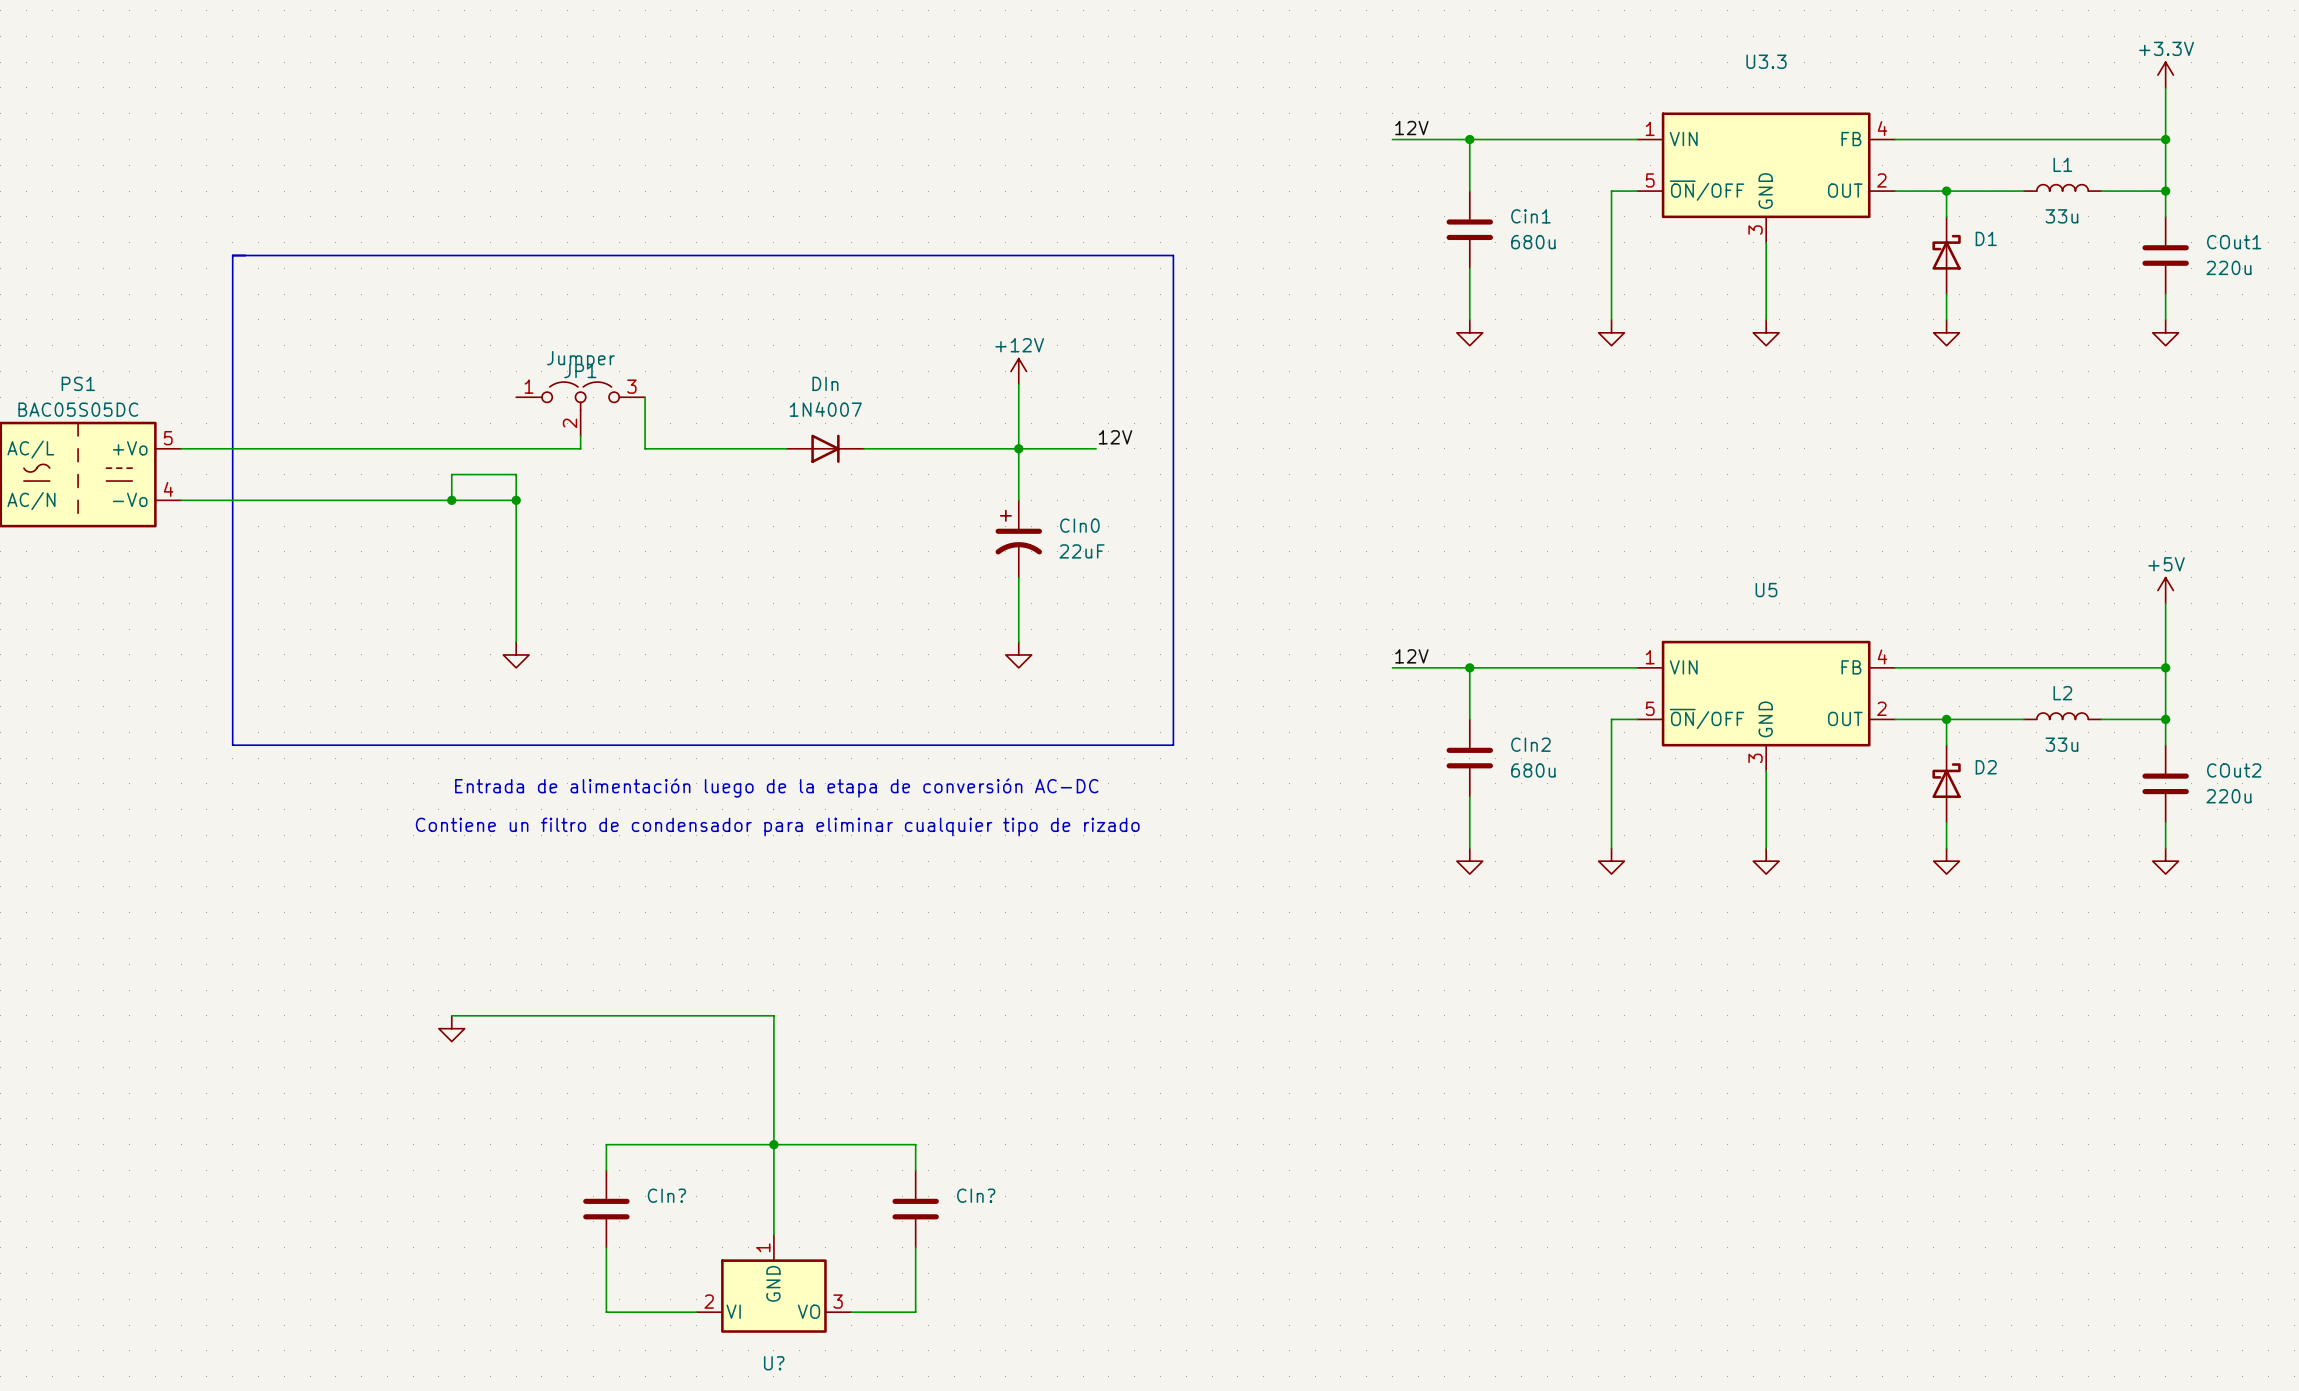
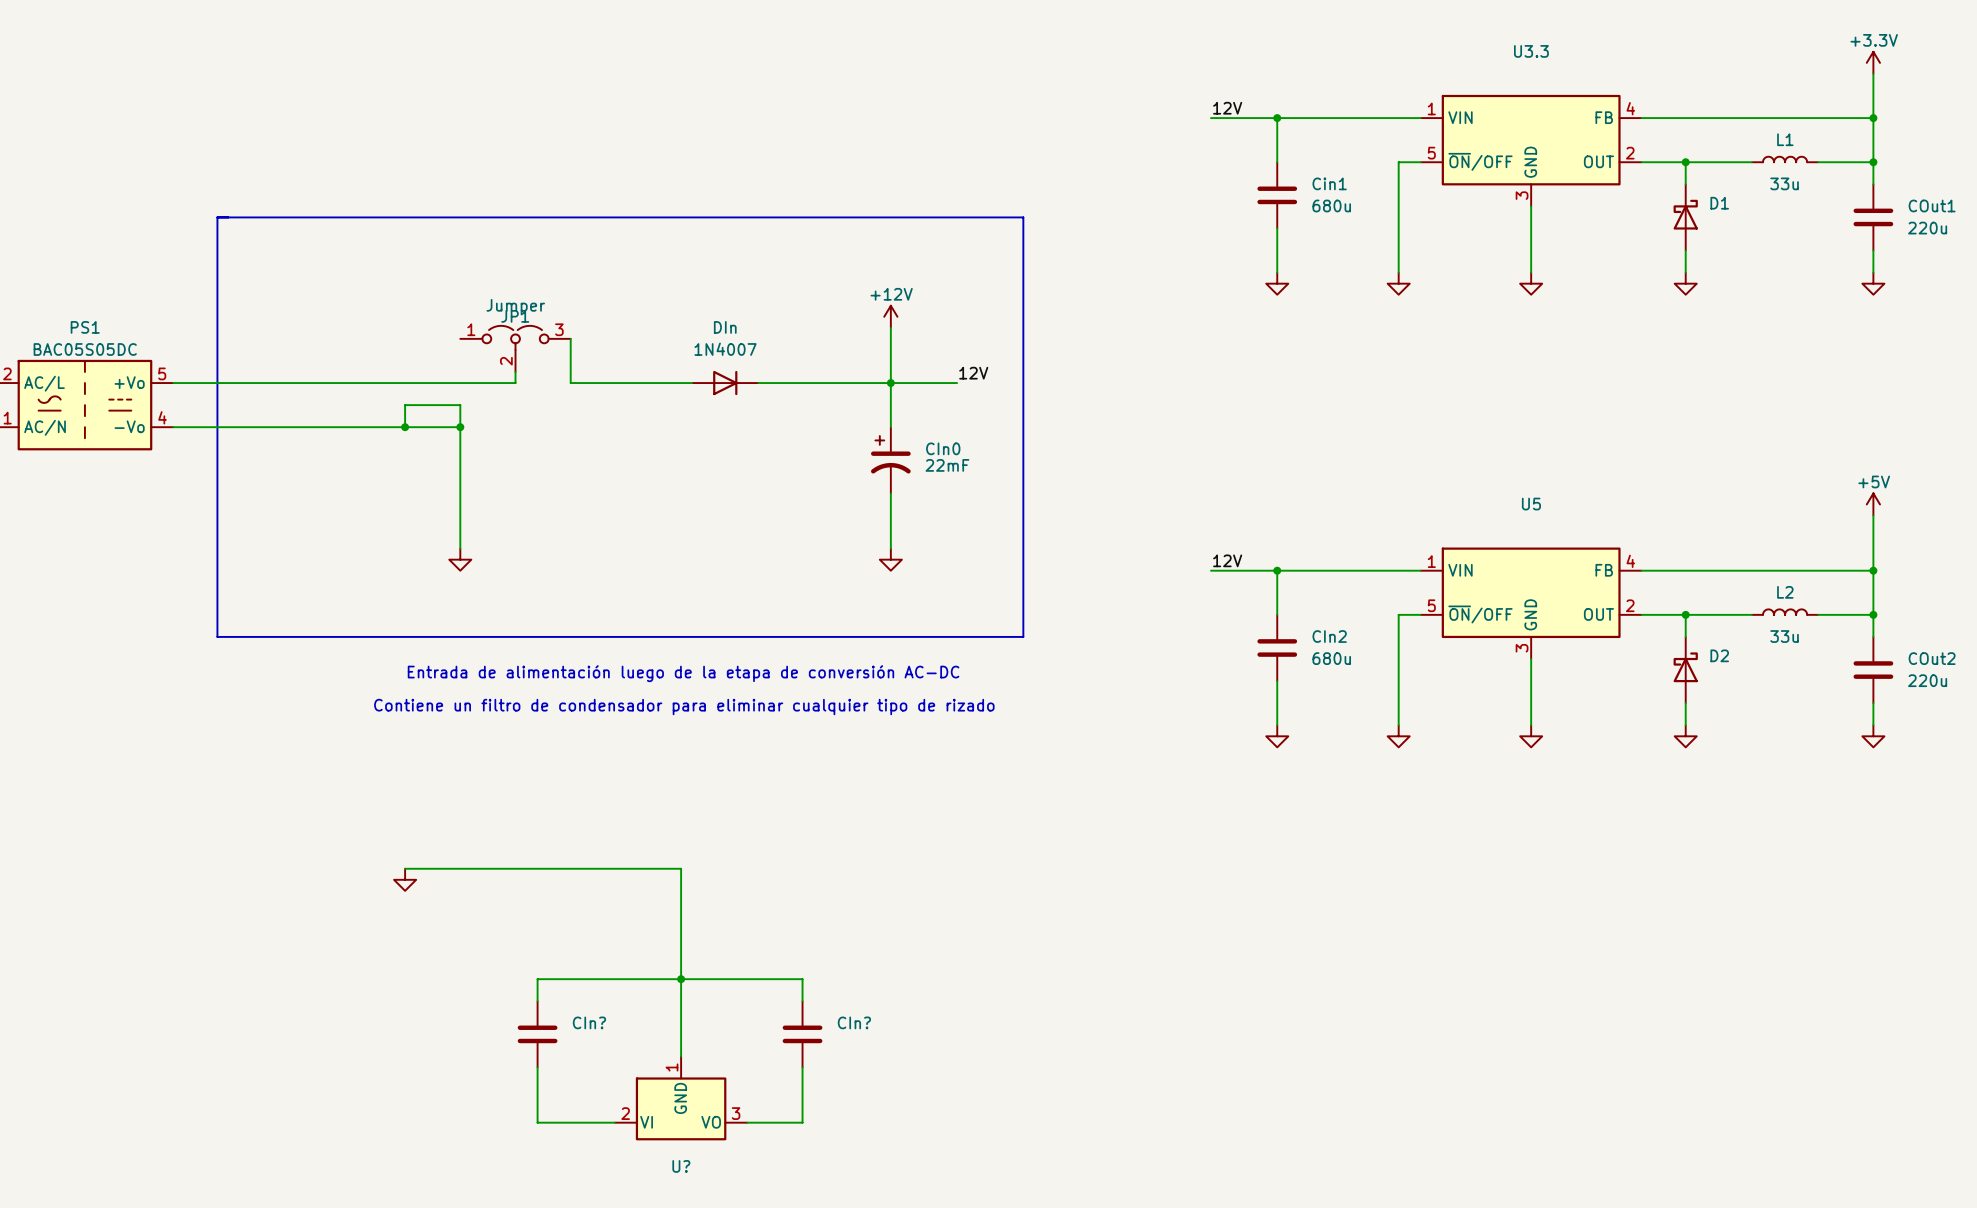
CIn0 value: 22uF (1082, 551) -> 22mF (947, 465)

